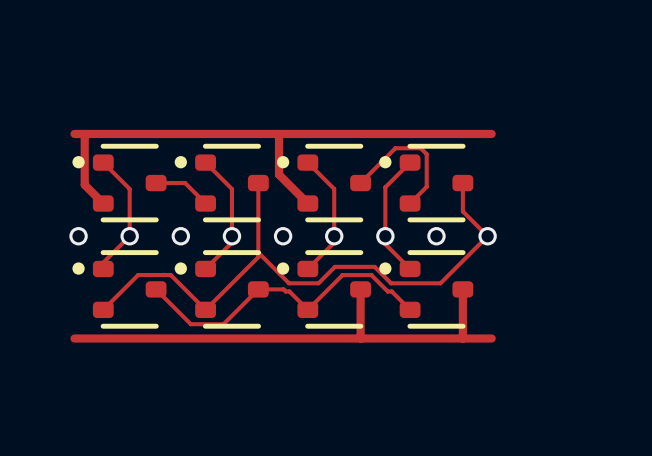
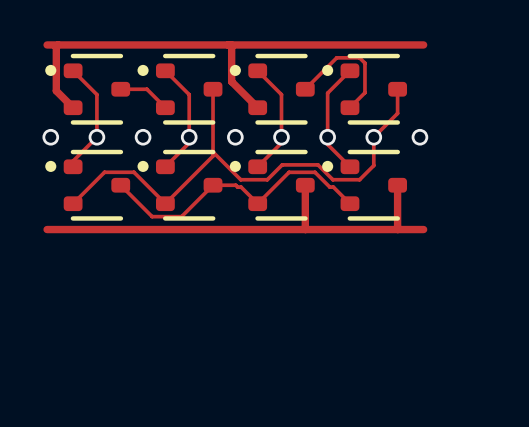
top track: (462, 209) (487, 236) (440, 283) (420, 283) -> (397, 113) (373, 137) (373, 165) (359, 179)

